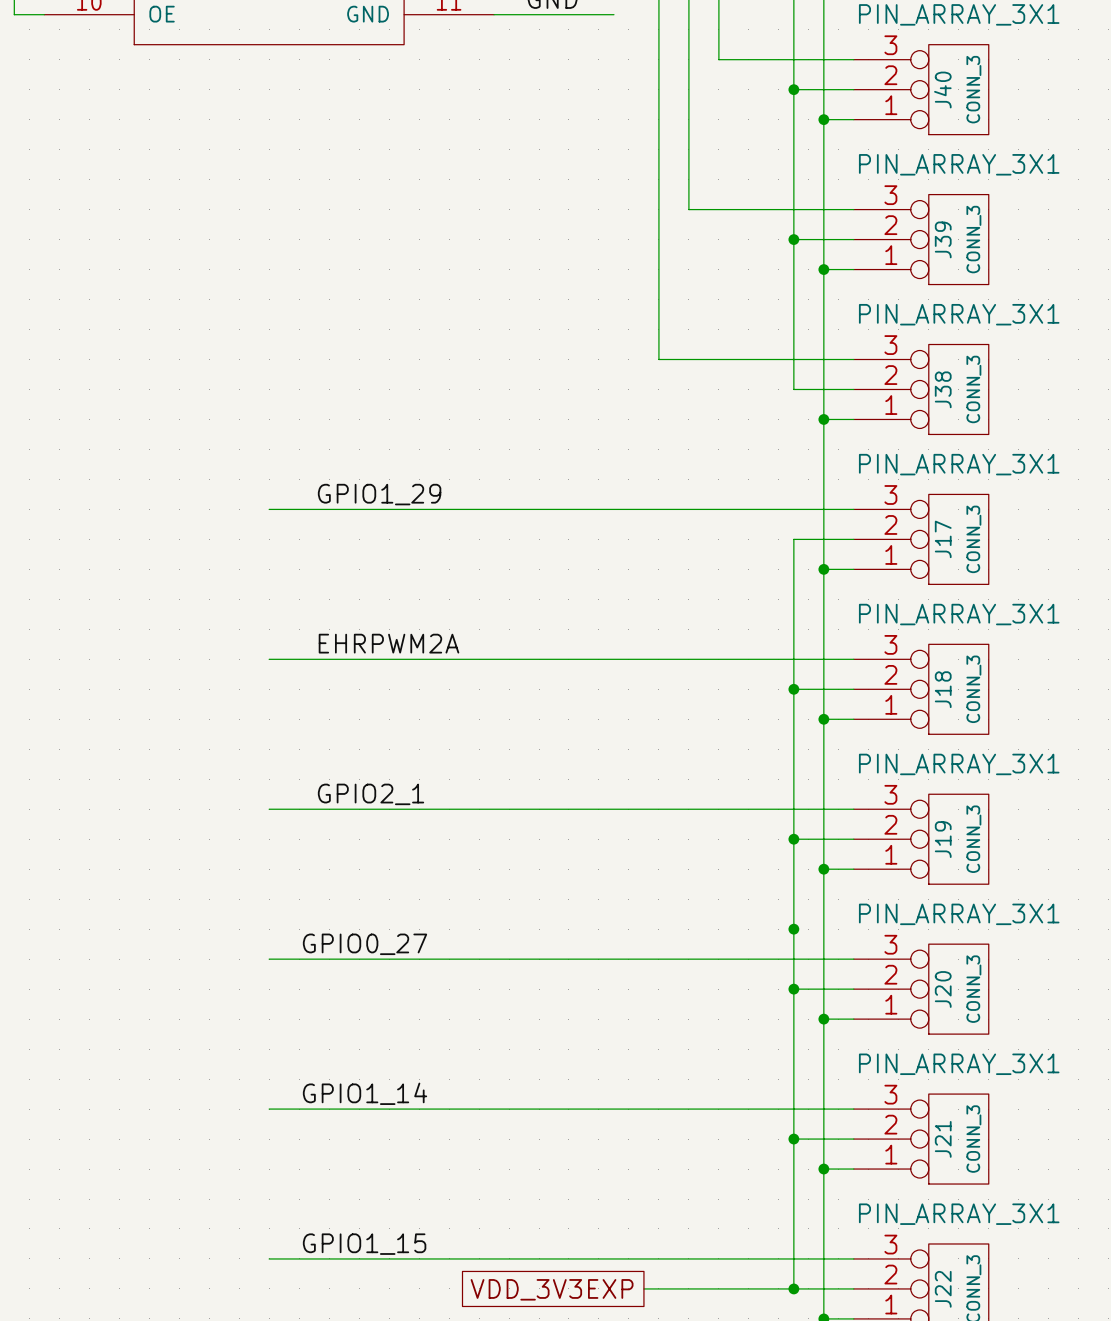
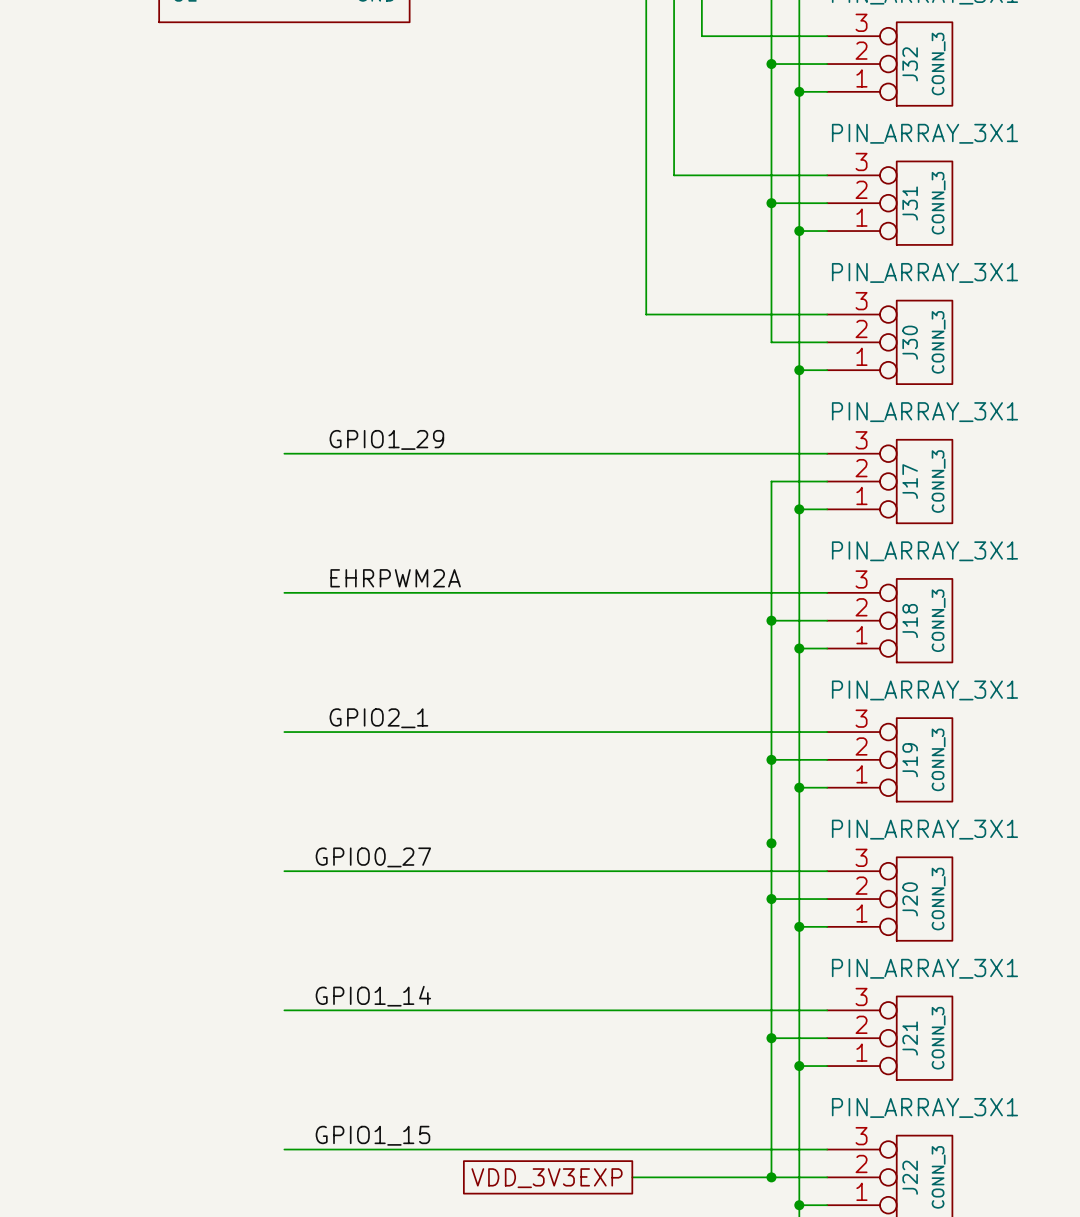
J40 name: J40 (942, 90) -> J32 (910, 64)
J39 name: J39 (943, 239) -> J31 (910, 203)
J38 name: J38 (943, 389) -> J30 (910, 342)

